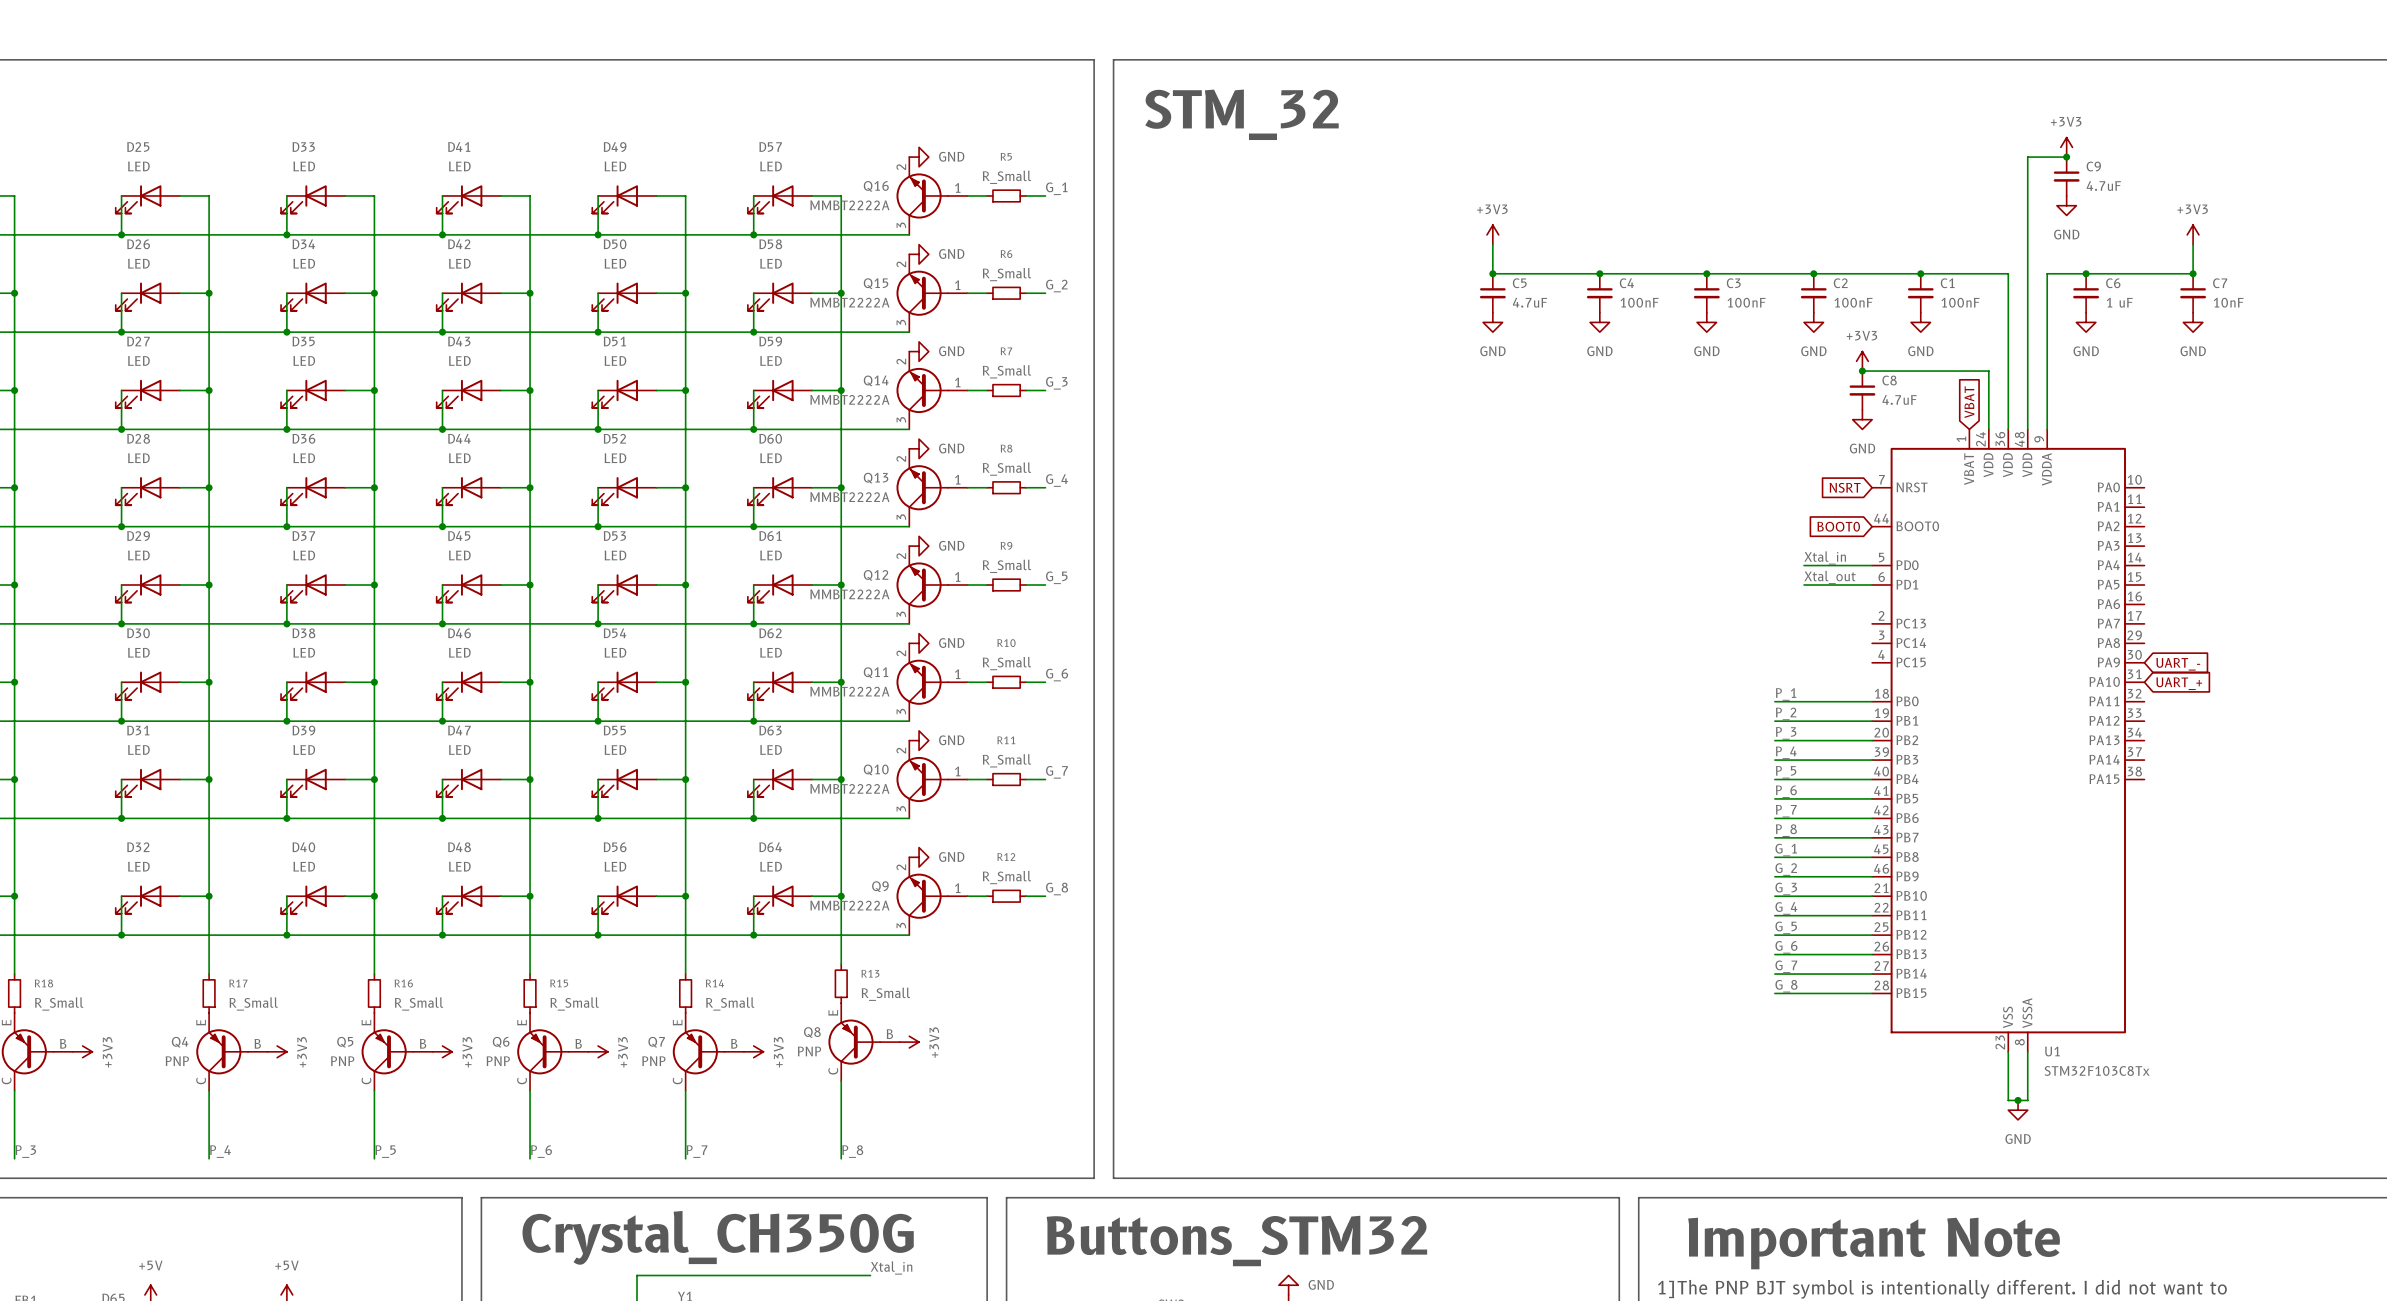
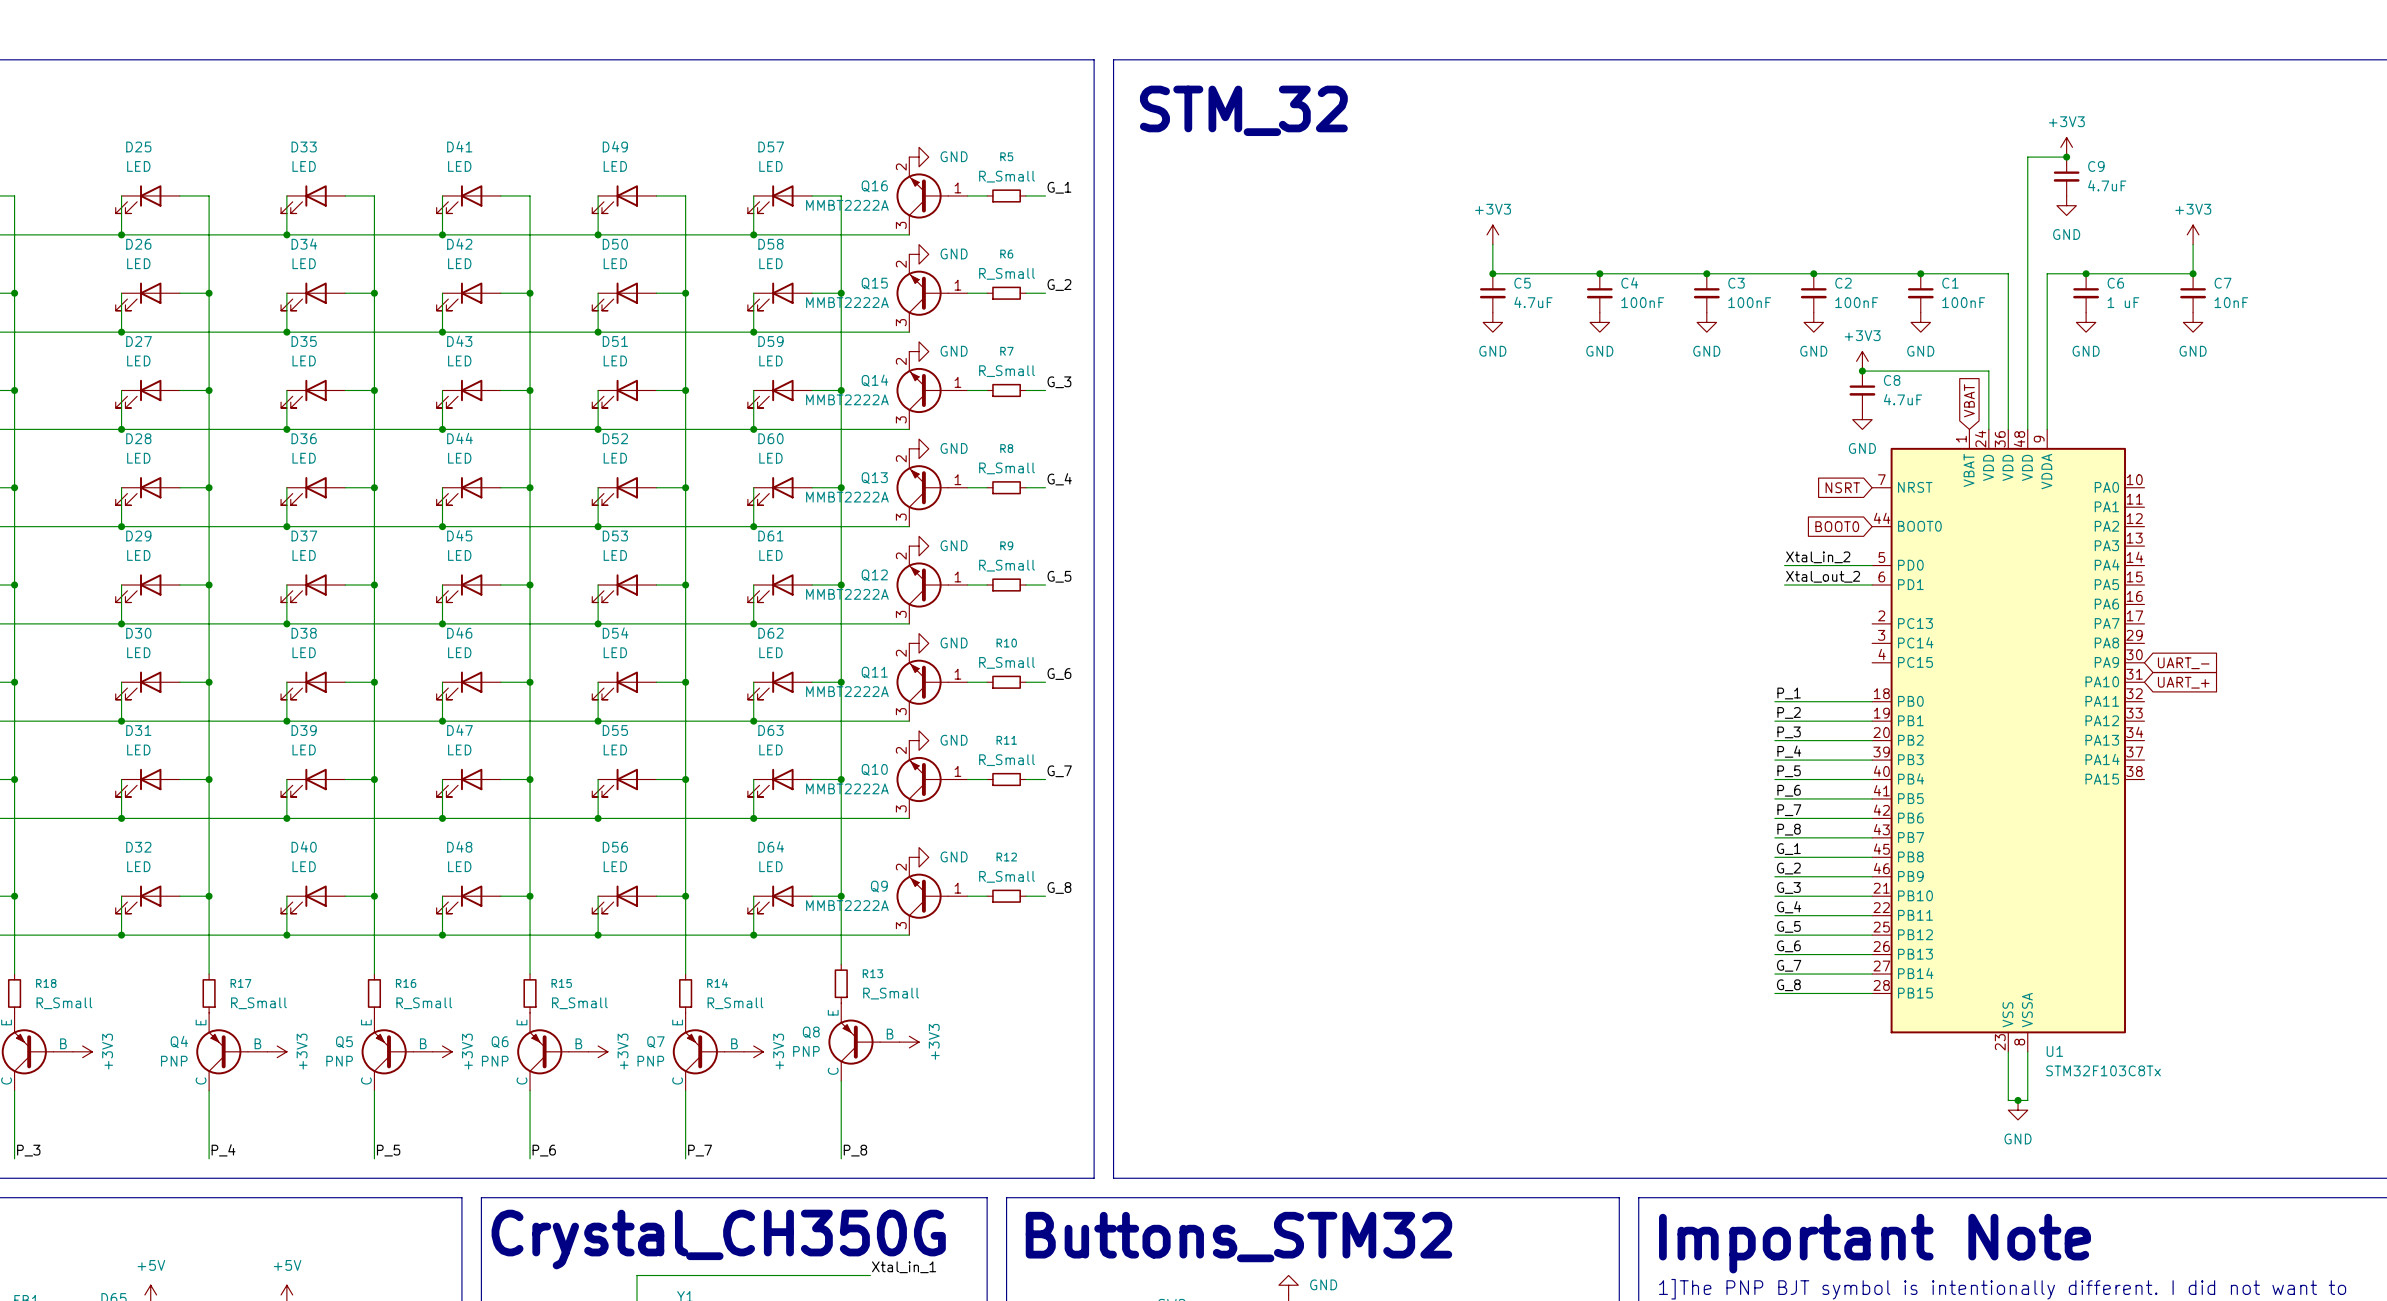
label: Xtal_in (1825, 558) -> Xtal_in_2 (1818, 557)
wire: none -> (1784, 565) (1804, 565)
label: Xtal_out (1830, 577) -> Xtal_out_2 (1823, 576)
wire: none -> (1784, 585) (1804, 585)
label: Xtal_in (891, 1267) -> Xtal_in_1 (904, 1267)

